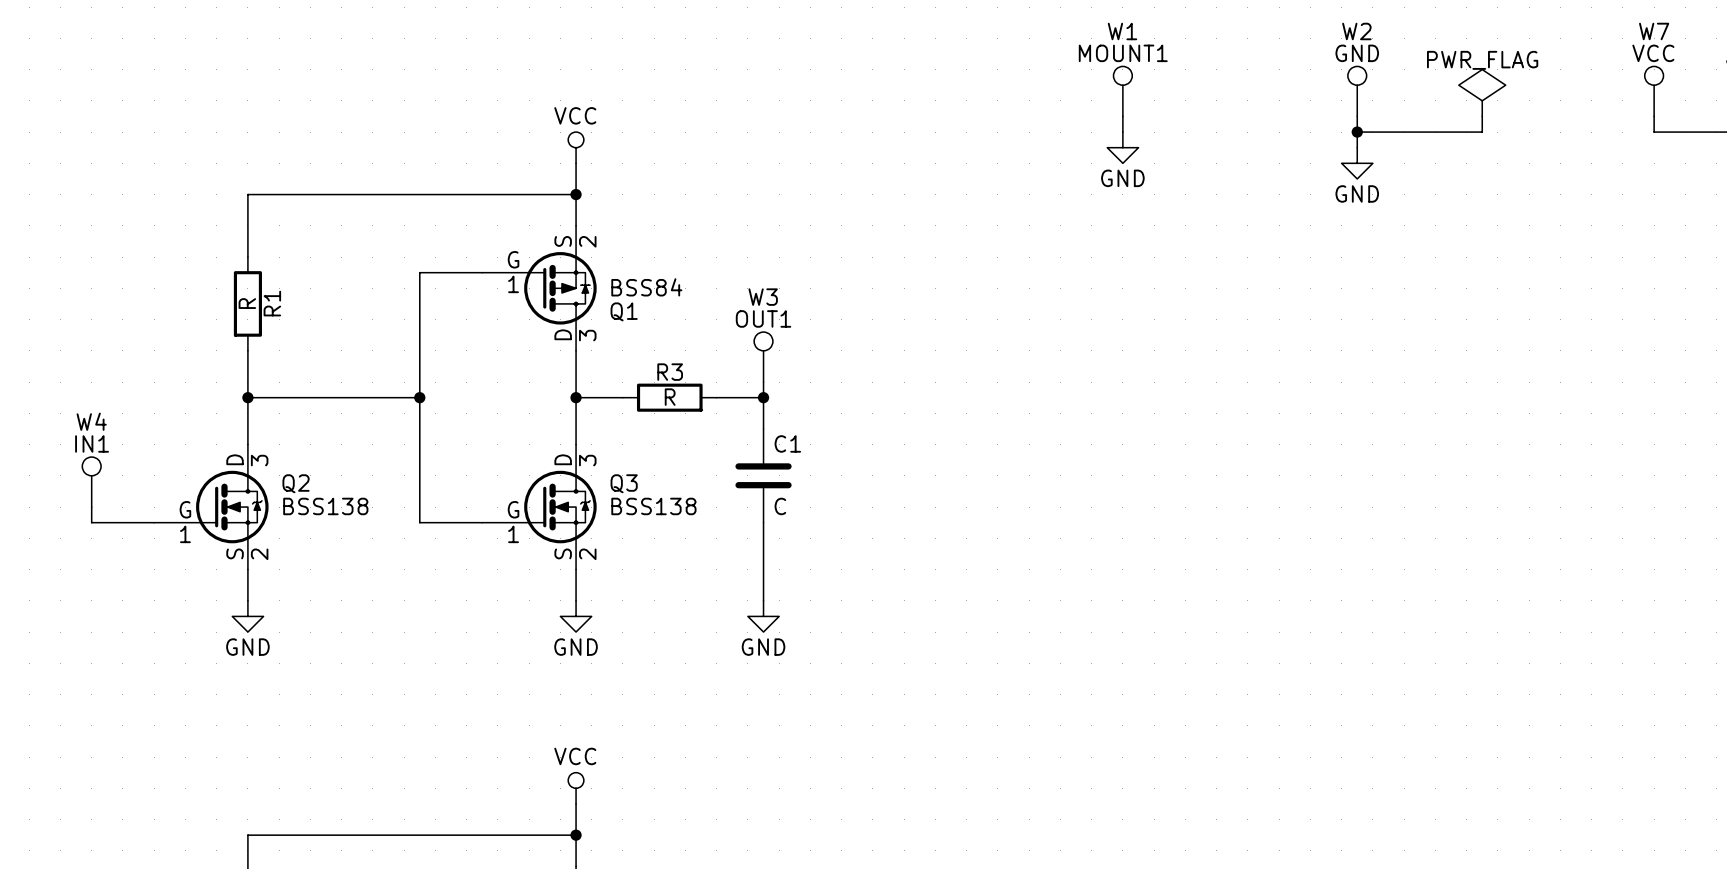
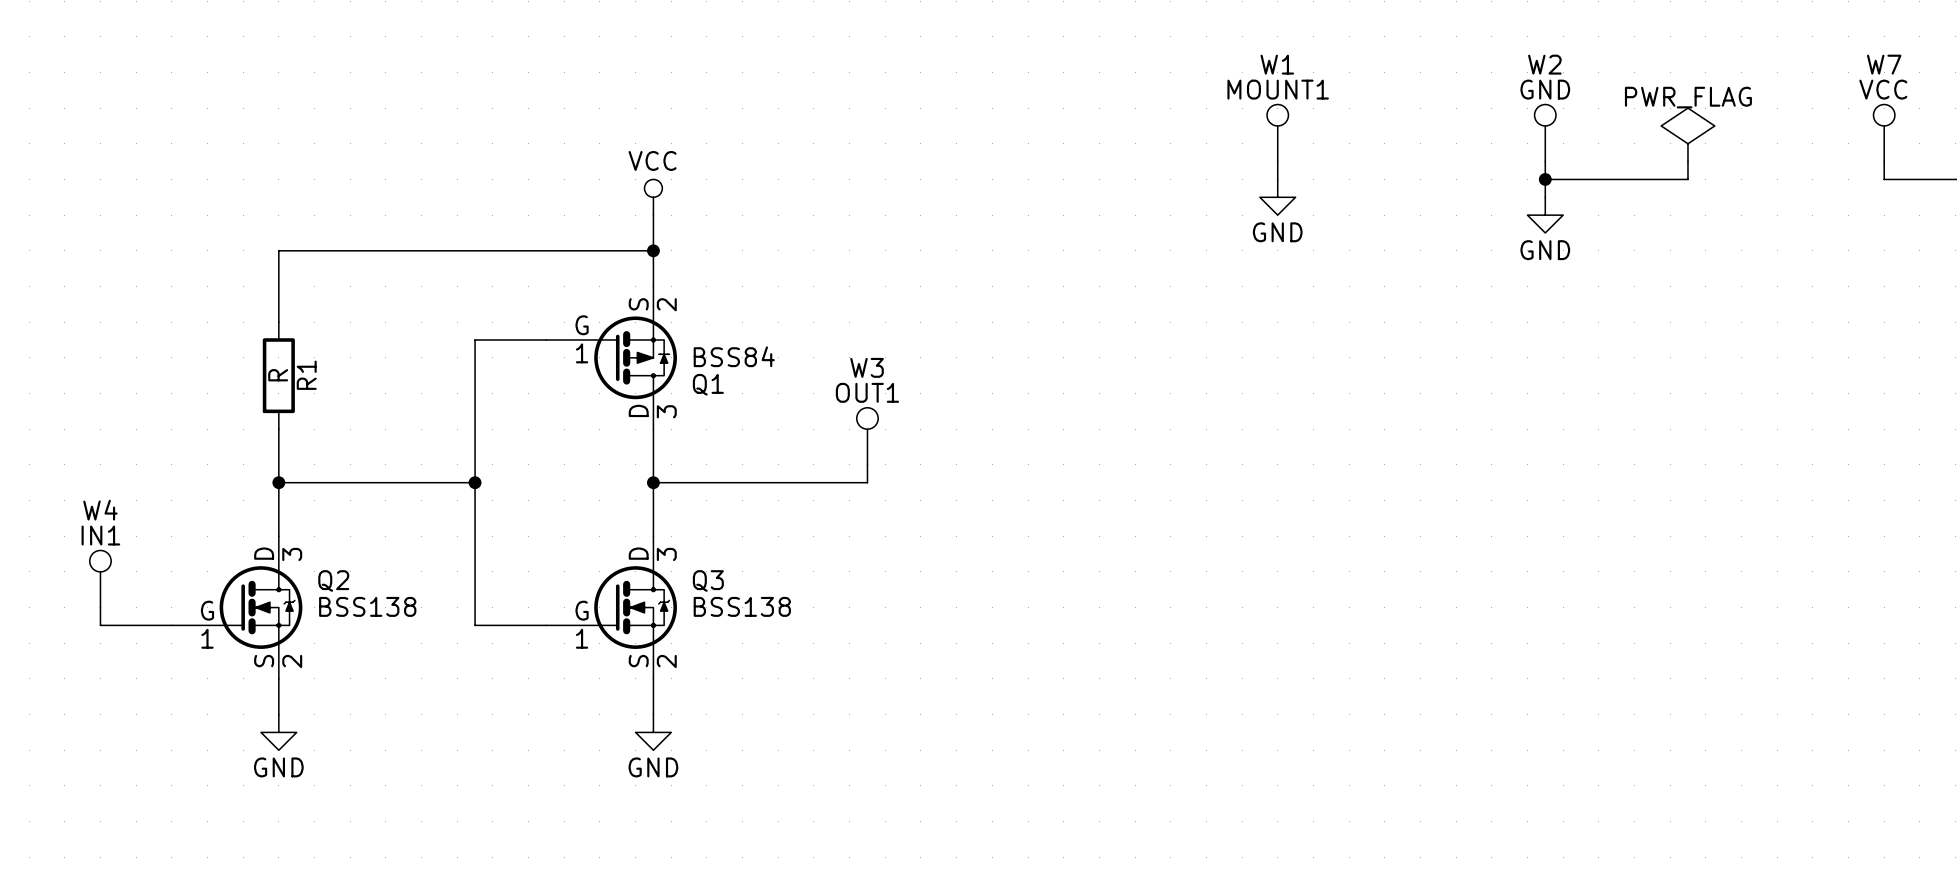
wire: none -> (706, 482) (813, 482)
R3: R (669, 397) -> none
wire: (763, 397) (763, 428) -> none
junction: (763, 397) -> none
C1: C (763, 475) -> none
wire: (763, 522) (763, 600) -> none
power symbol: GND (763, 616) -> none

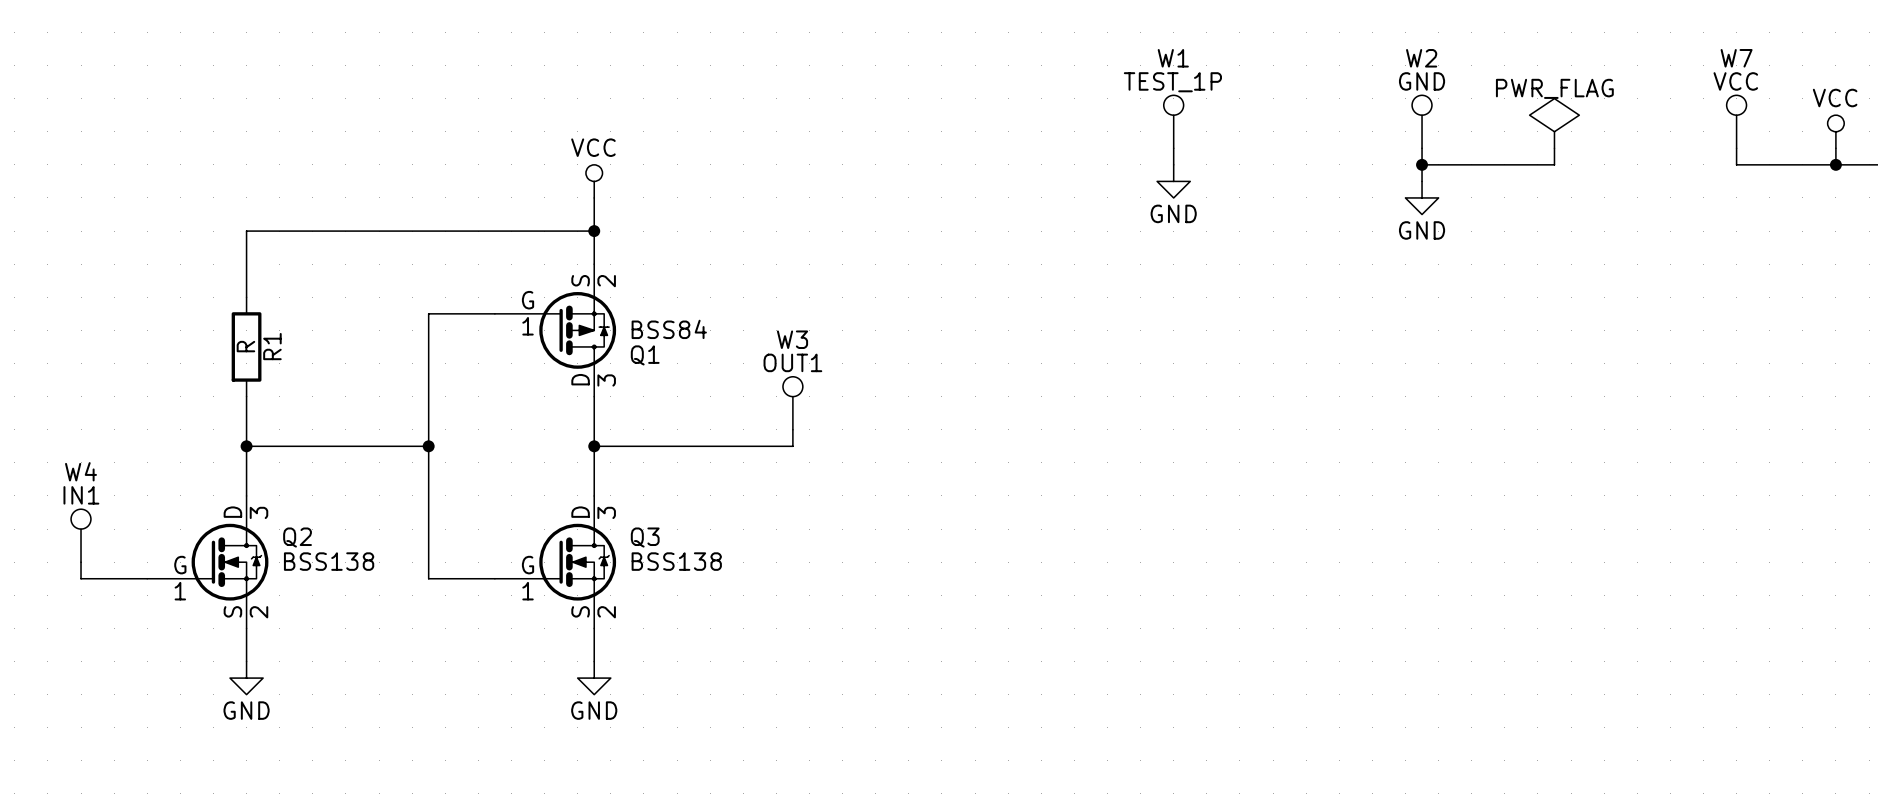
W1 value: MOUNT1 (1278, 89) -> TEST_1P (1172, 82)

